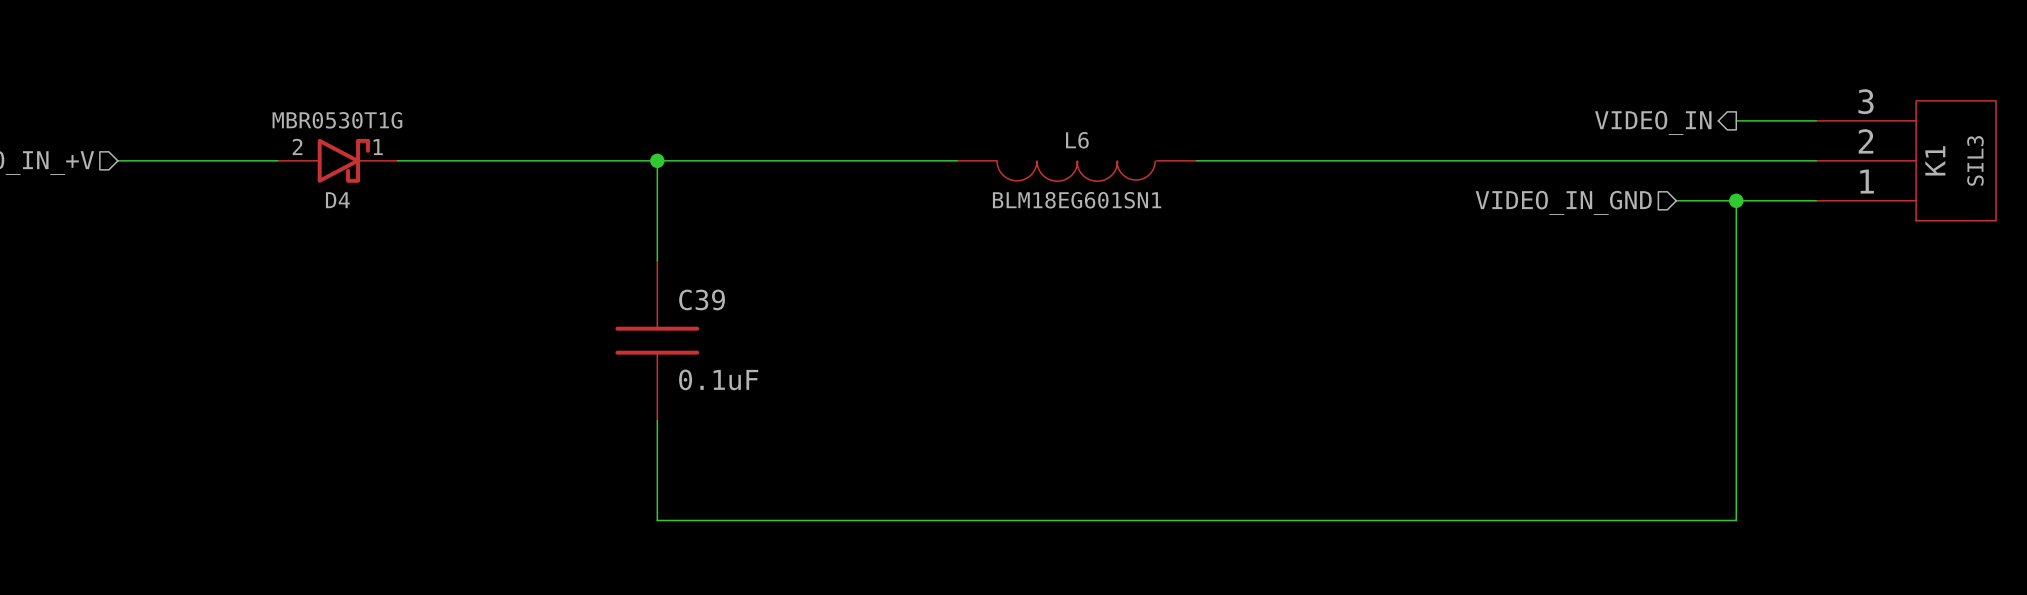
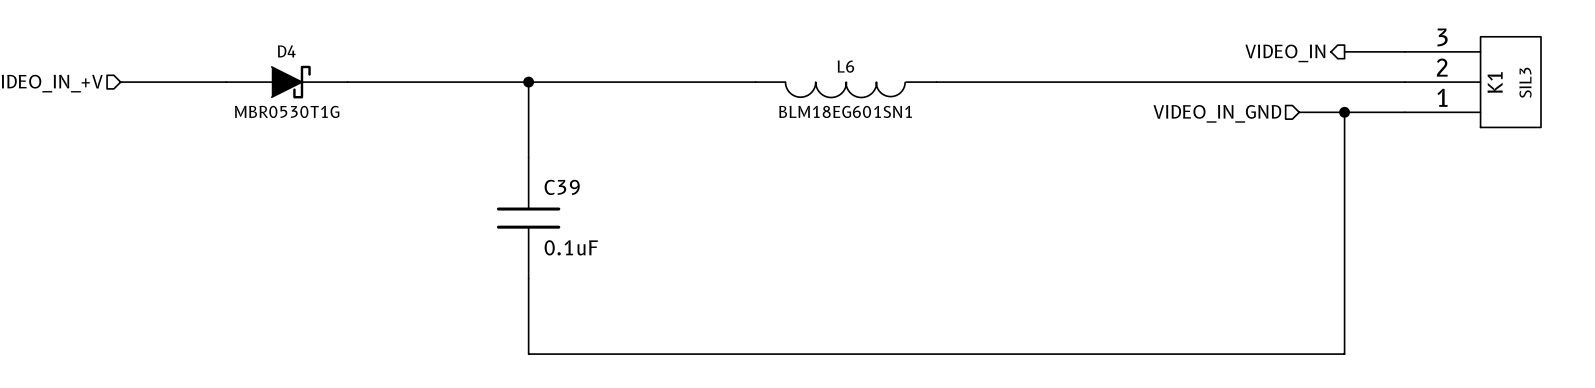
D4 value position: MBR0530T1G (337, 120) -> MBR0530T1G (287, 111)
D4 symbol: [277, 138, 398, 183] -> [226, 65, 348, 99]
D4 name position: D4 (337, 200) -> D4 (286, 51)

